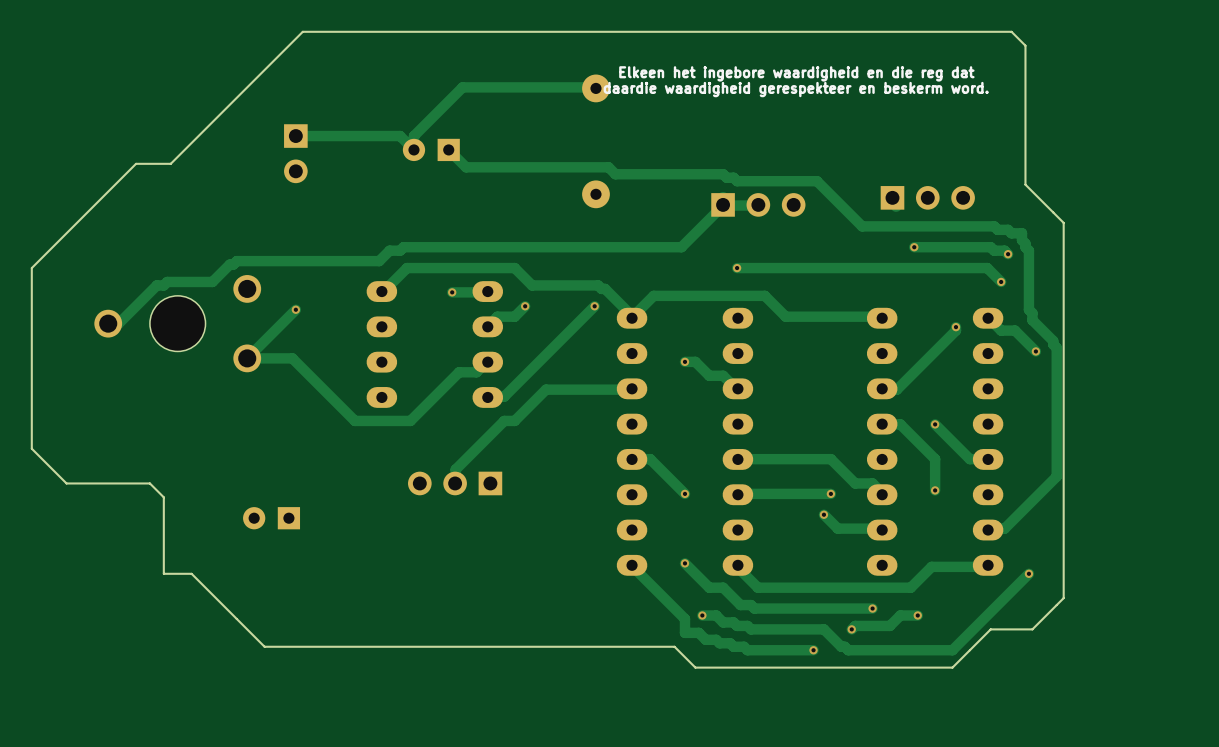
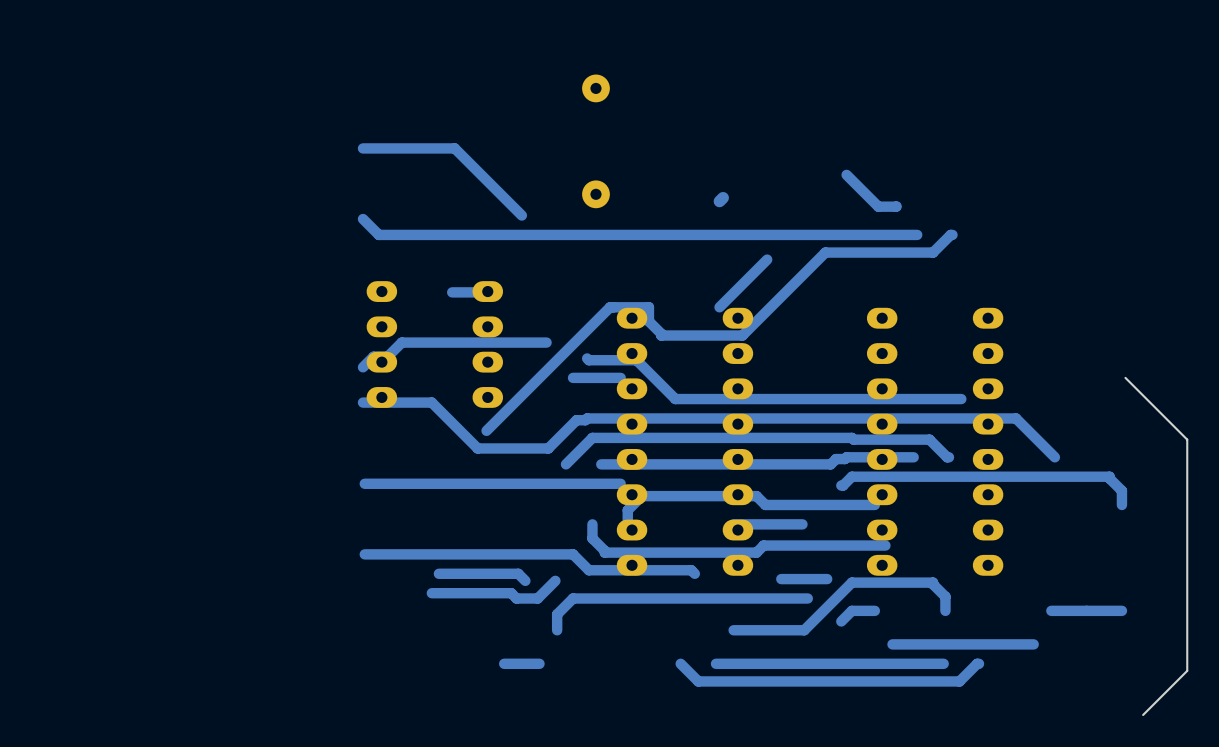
board edge: (1011, 31) (1025, 45) (1025, 184) (1063, 222) (1063, 598) (1032, 629) (990, 629) (952, 667) (695, 667) (674, 646) (264, 646) (191, 573) (163, 573) (163, 497) (149, 483) (66, 483) (31, 448) (31, 268) (136, 163) (170, 163) (302, 31) (1011, 31) -> none
text: Elkeen het ingebore waardigheid en die reg dat (796, 73) -> none
track: (595, 88) (462, 87) (413, 136) (413, 149) (400, 136) (295, 136) -> none
text: daardie waardigheid gerespekteer en beskerm word. (796, 89) -> none
track: none -> (363, 148) (454, 148) (521, 215)
part: (431, 149) -> none
track: (448, 149) (466, 167) (608, 167) (615, 174) (723, 174) (726, 177) (733, 177) (737, 181) (817, 181) (862, 226) (994, 226) (997, 229) (1021, 233) (1021, 240) (1028, 250) (1028, 309) (1032, 313) (1032, 320) (1053, 341) (1053, 344) (1056, 347) (1056, 476) (1004, 528) (987, 528) (988, 530) -> none
part: (295, 153) -> none
track: none -> (846, 174) (878, 206) (896, 206)
part: (927, 197) -> none
track: (758, 204) (761, 205) (719, 205) (723, 204) (723, 205) (681, 247) (403, 247) (400, 250) (389, 250) (379, 261) (236, 261) (233, 264) (229, 264) (212, 281) (167, 281) (163, 285) (156, 285) (118, 323) (108, 323) -> none
part: (758, 204) -> none
track: none -> (363, 219) (378, 234) (917, 234)
track: none -> (952, 234) (933, 252) (825, 252) (742, 335) (661, 335) (648, 321) (648, 307) (610, 307) (486, 430)
track: (914, 247) (990, 247) (994, 250) (1004, 250) (1008, 254) -> none
via: (914, 247) -> none
via: (1008, 254) -> none
track: none -> (767, 259) (719, 307)
track: (737, 268) (987, 268) (1001, 281) -> none
via: (737, 268) -> none
via: (1001, 281) -> none
track: (381, 291) (407, 268) (514, 268) (532, 285) (598, 285) (601, 288) (605, 288) (632, 316) -> none
via: (452, 292) -> none
track: (525, 306) (514, 316) (497, 316) (487, 326) -> none
via: (525, 306) -> none
track: (594, 306) (504, 396) (487, 397) -> none
via: (594, 306) -> none
track: (295, 309) (247, 358) (292, 358) (354, 420) (410, 420) (459, 372) (476, 372) (487, 362) -> none
via: (295, 309) -> none
track: (632, 316) (653, 295) (764, 295) (785, 316) (883, 316) (882, 318) -> none
track: (988, 318) (987, 316) (1001, 330) (1015, 330) (1035, 351) -> none
part: (177, 323) -> none
track: (955, 327) (955, 330) (896, 389) (882, 388) -> none
via: (955, 327) -> none
track: none -> (546, 342) (401, 342) (387, 356) (373, 356) (363, 367)
via: (1035, 351) -> none
track: none -> (587, 358) (588, 360) (636, 360) (675, 399) (961, 399)
track: (684, 361) (695, 361) (709, 375) (723, 375) (737, 388) -> none
via: (684, 361) -> none
track: none -> (620, 377) (573, 377)
board edge: none -> (1125, 377) (1187, 439) (1187, 670) (1143, 714)
track: (632, 388) (546, 389) (514, 420) (504, 420) (455, 469) (455, 483) -> none
track: none -> (363, 402) (431, 402) (477, 448) (548, 448) (576, 420) (587, 418) (1016, 418) (1054, 457)
track: (882, 424) (900, 424) (935, 459) (935, 490) -> none
track: (935, 424) (969, 459) (988, 459) -> none
via: (935, 424) -> none
track: none -> (913, 457) (846, 457) (836, 459) (830, 464) (601, 464)
track: none -> (948, 457) (929, 439) (592, 437) (565, 464)
track: (632, 459) (650, 459) (684, 493) -> none
track: (737, 459) (830, 459) (855, 483) (872, 483) (882, 494) -> none
part: (455, 483) -> none
track: none -> (620, 483) (364, 483)
track: none -> (841, 485) (851, 476) (1109, 476) (1121, 490) (1121, 504)
via: (935, 490) -> none
via: (684, 493) -> none
track: (830, 493) (737, 494) -> none
via: (830, 493) -> none
track: none -> (874, 504) (765, 504) (756, 496) (640, 496) (627, 510) (627, 524)
track: (823, 514) (837, 528) (883, 528) (882, 530) -> none
via: (823, 514) -> none
part: (271, 518) -> none
track: none -> (592, 524) (592, 538) (604, 552) (756, 552) (763, 545) (885, 545)
track: none -> (802, 524) (733, 524)
track: none -> (364, 554) (573, 554) (588, 570) (691, 570) (694, 573)
track: (684, 563) (709, 587) (723, 587) (740, 605) (750, 605) (754, 608) (872, 608) -> none
via: (684, 563) -> none
track: (632, 565) (684, 618) (684, 632) (698, 632) (705, 639) (716, 639) (719, 643) (730, 643) (733, 646) (744, 646) (747, 650) (813, 650) -> none
track: (988, 565) (987, 566) (931, 566) (910, 587) (757, 587) (737, 566) (737, 565) -> none
track: none -> (438, 573) (518, 573) (525, 580)
track: (1028, 573) (952, 650) (848, 650) (844, 646) (841, 646) (823, 629) (750, 629) (747, 625) (723, 622) (716, 615) (702, 615) -> none
via: (1028, 573) -> none
track: none -> (827, 579) (781, 579)
track: none -> (555, 580) (537, 598) (516, 598) (511, 593) (431, 593)
track: none -> (807, 598) (573, 598) (557, 614) (557, 630)
via: (872, 608) -> none
track: none -> (874, 610) (851, 610) (841, 621)
track: none -> (945, 610) (945, 596) (933, 582) (851, 582) (804, 630) (733, 630)
track: none -> (1121, 610) (1051, 610)
via: (702, 615) -> none
track: (917, 615) (900, 615) (889, 625) (855, 625) (851, 629) -> none
via: (917, 615) -> none
via: (851, 629) -> none
track: none -> (1033, 644) (892, 644)
via: (813, 650) -> none
track: none -> (539, 663) (504, 663)
track: none -> (943, 663) (716, 663)
track: none -> (978, 663) (959, 681) (698, 681) (680, 663)

